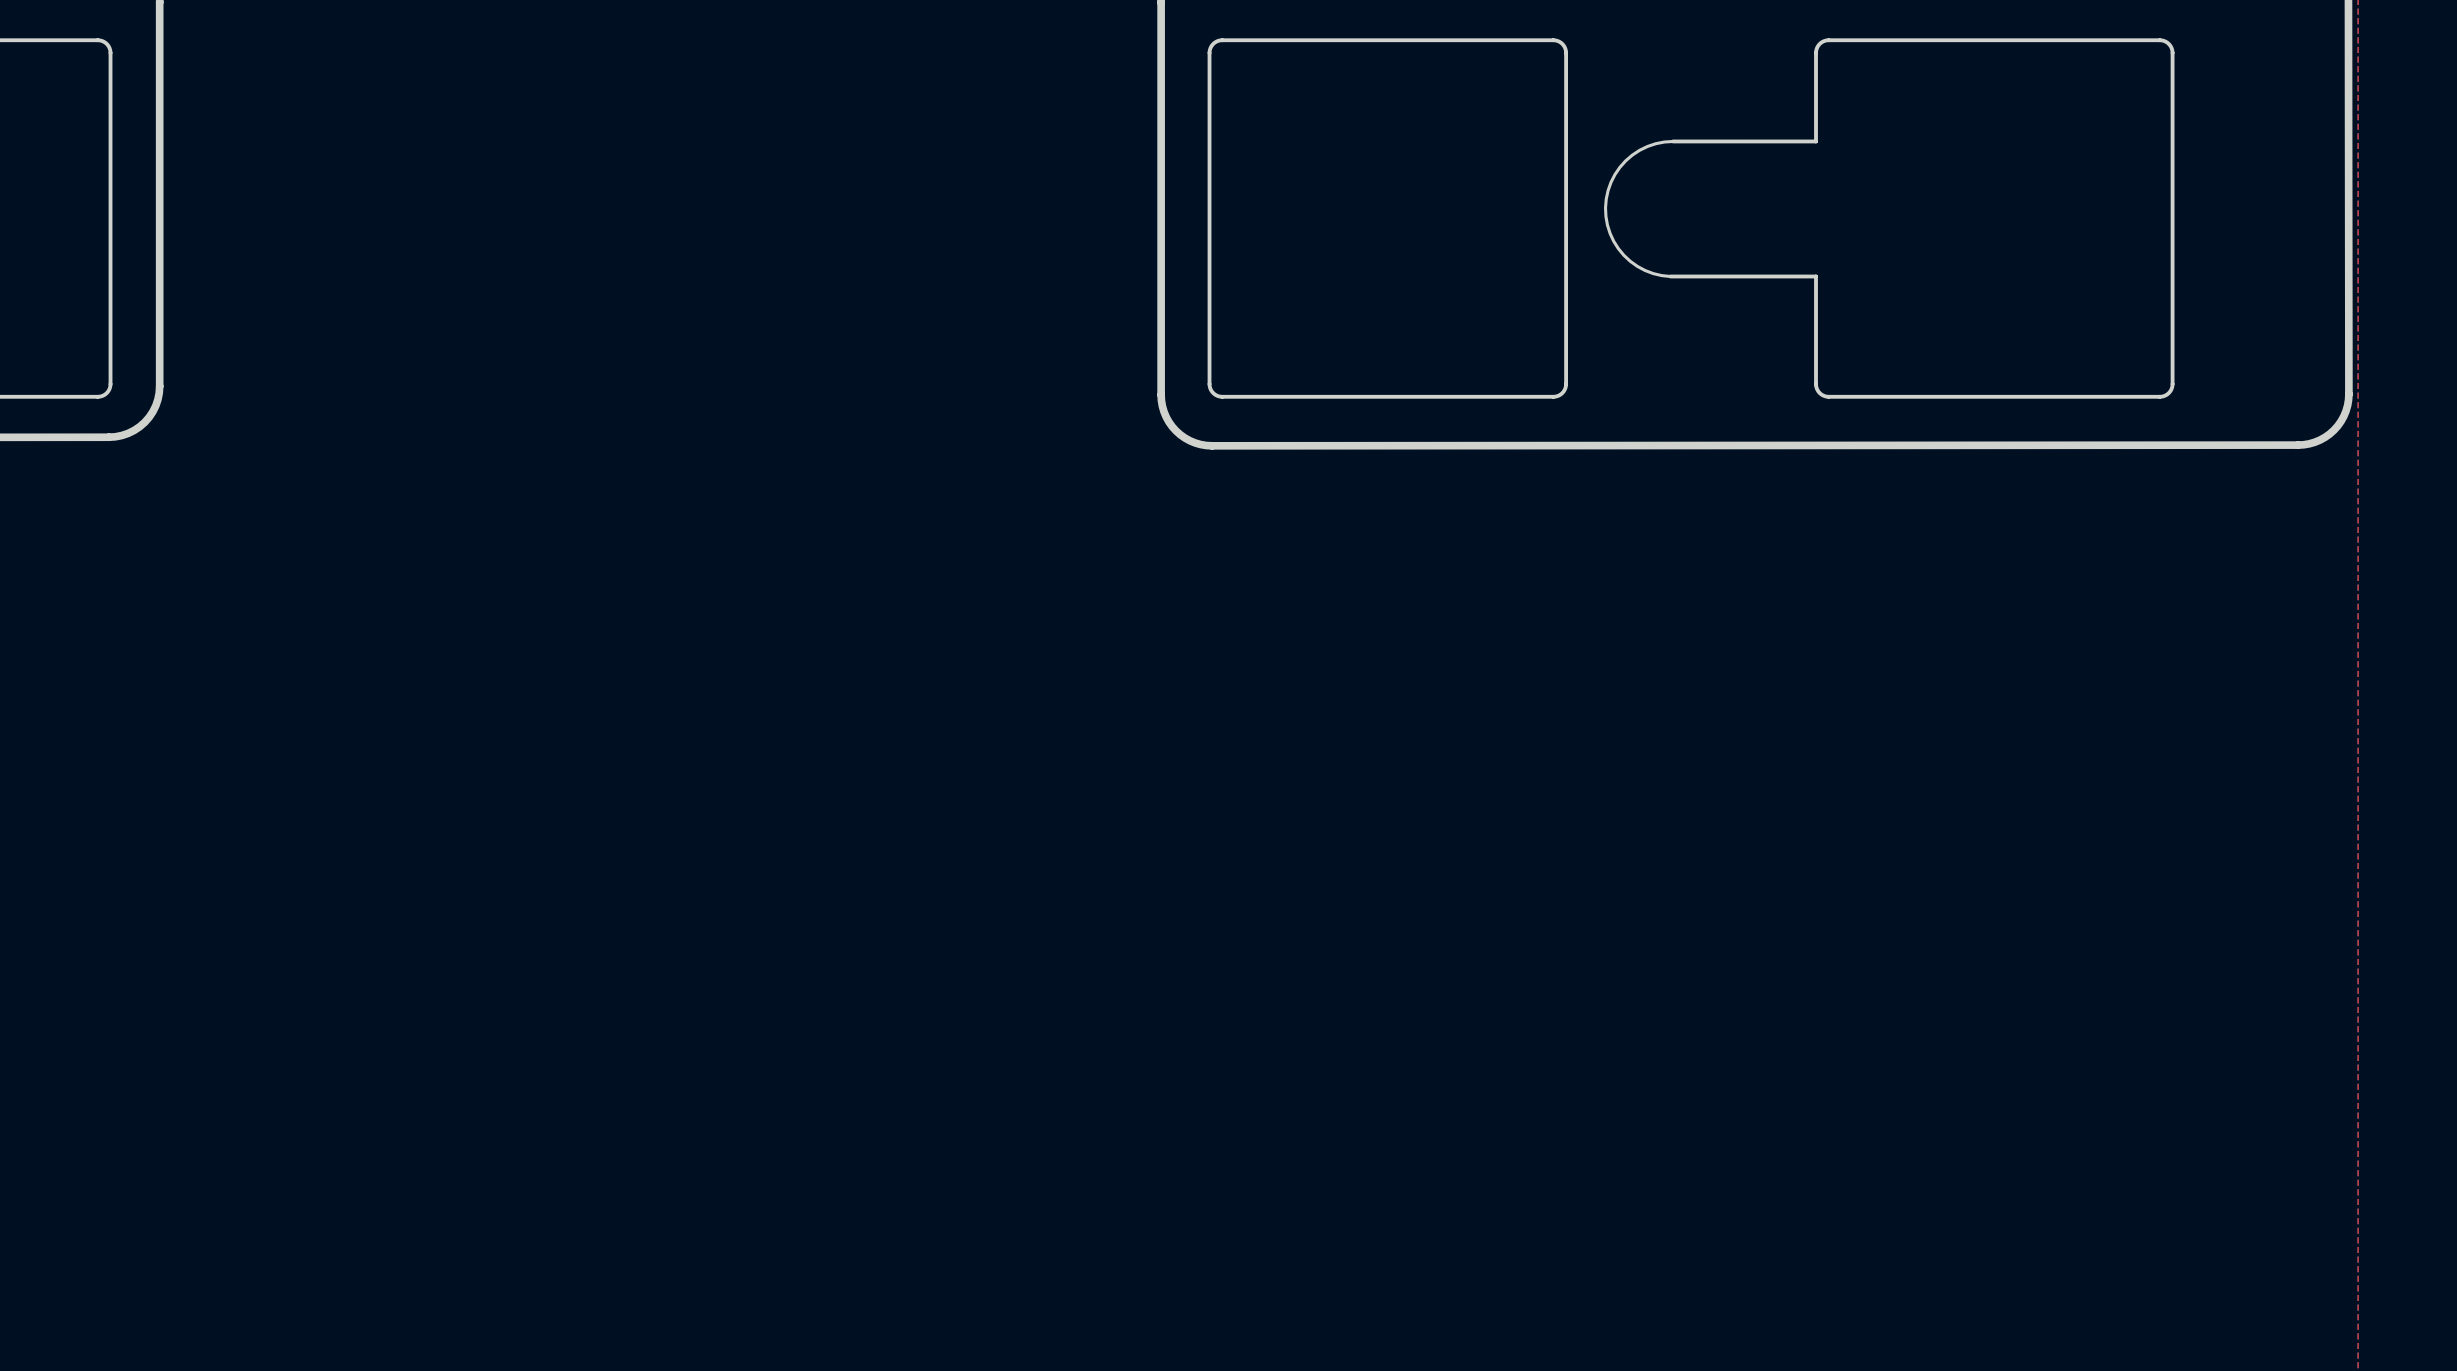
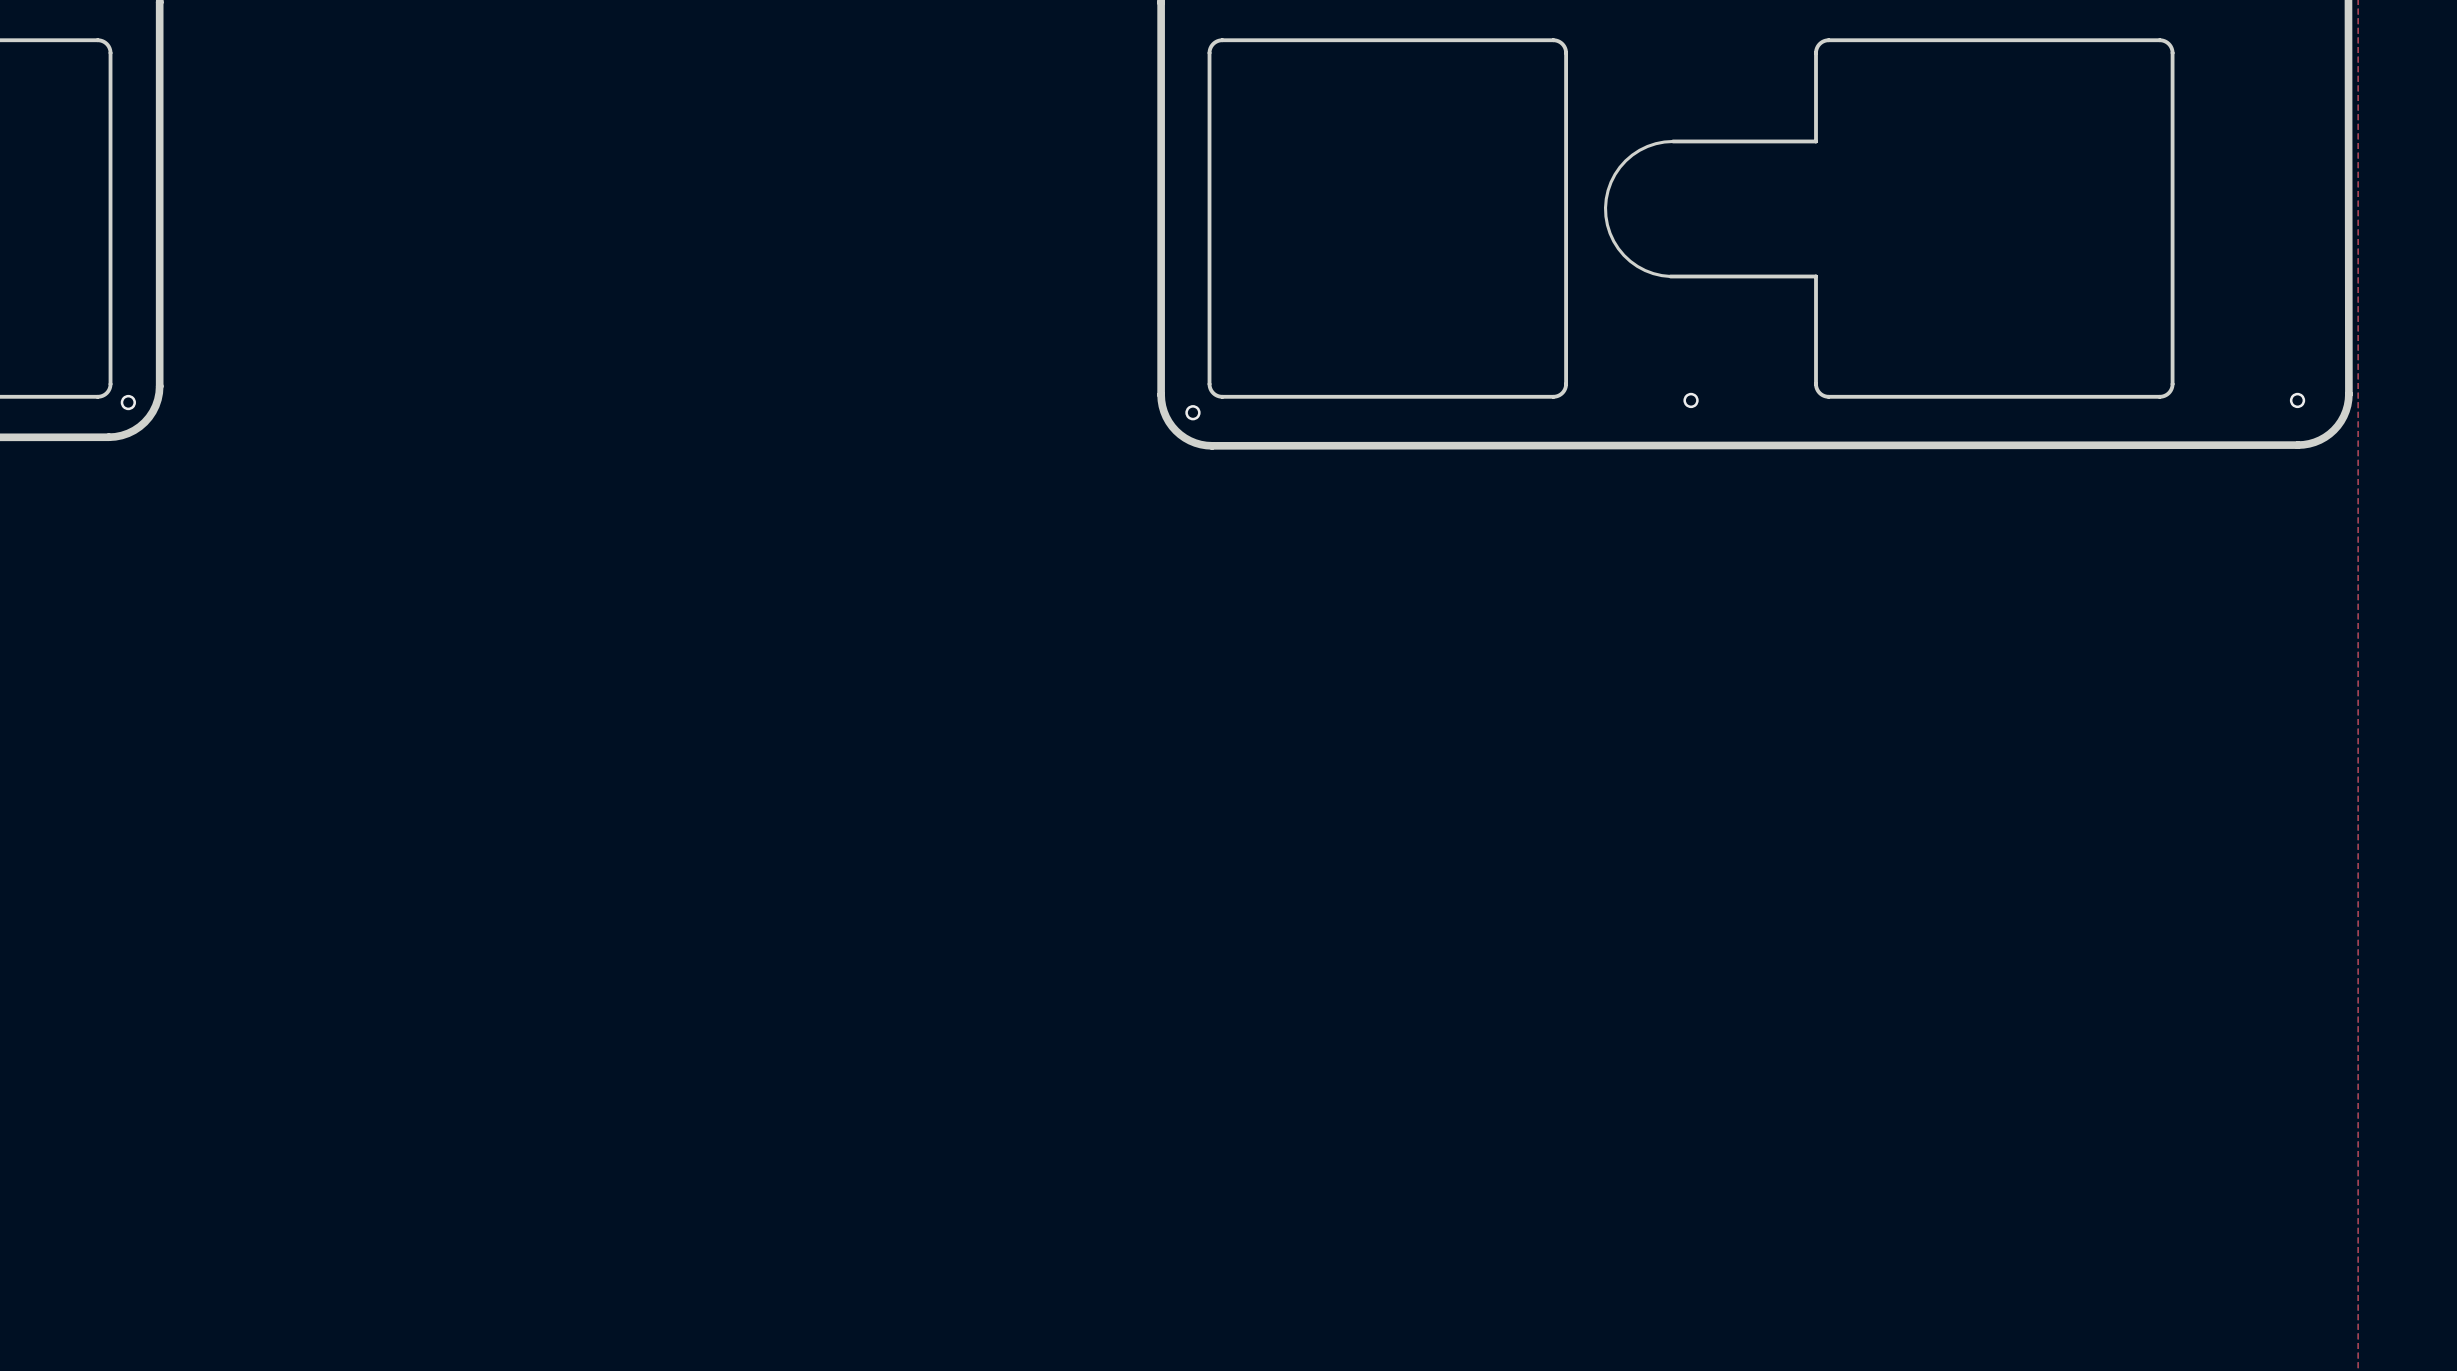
via: none -> (1691, 400)
via: none -> (2297, 400)
via: none -> (128, 402)
via: none -> (1192, 412)

